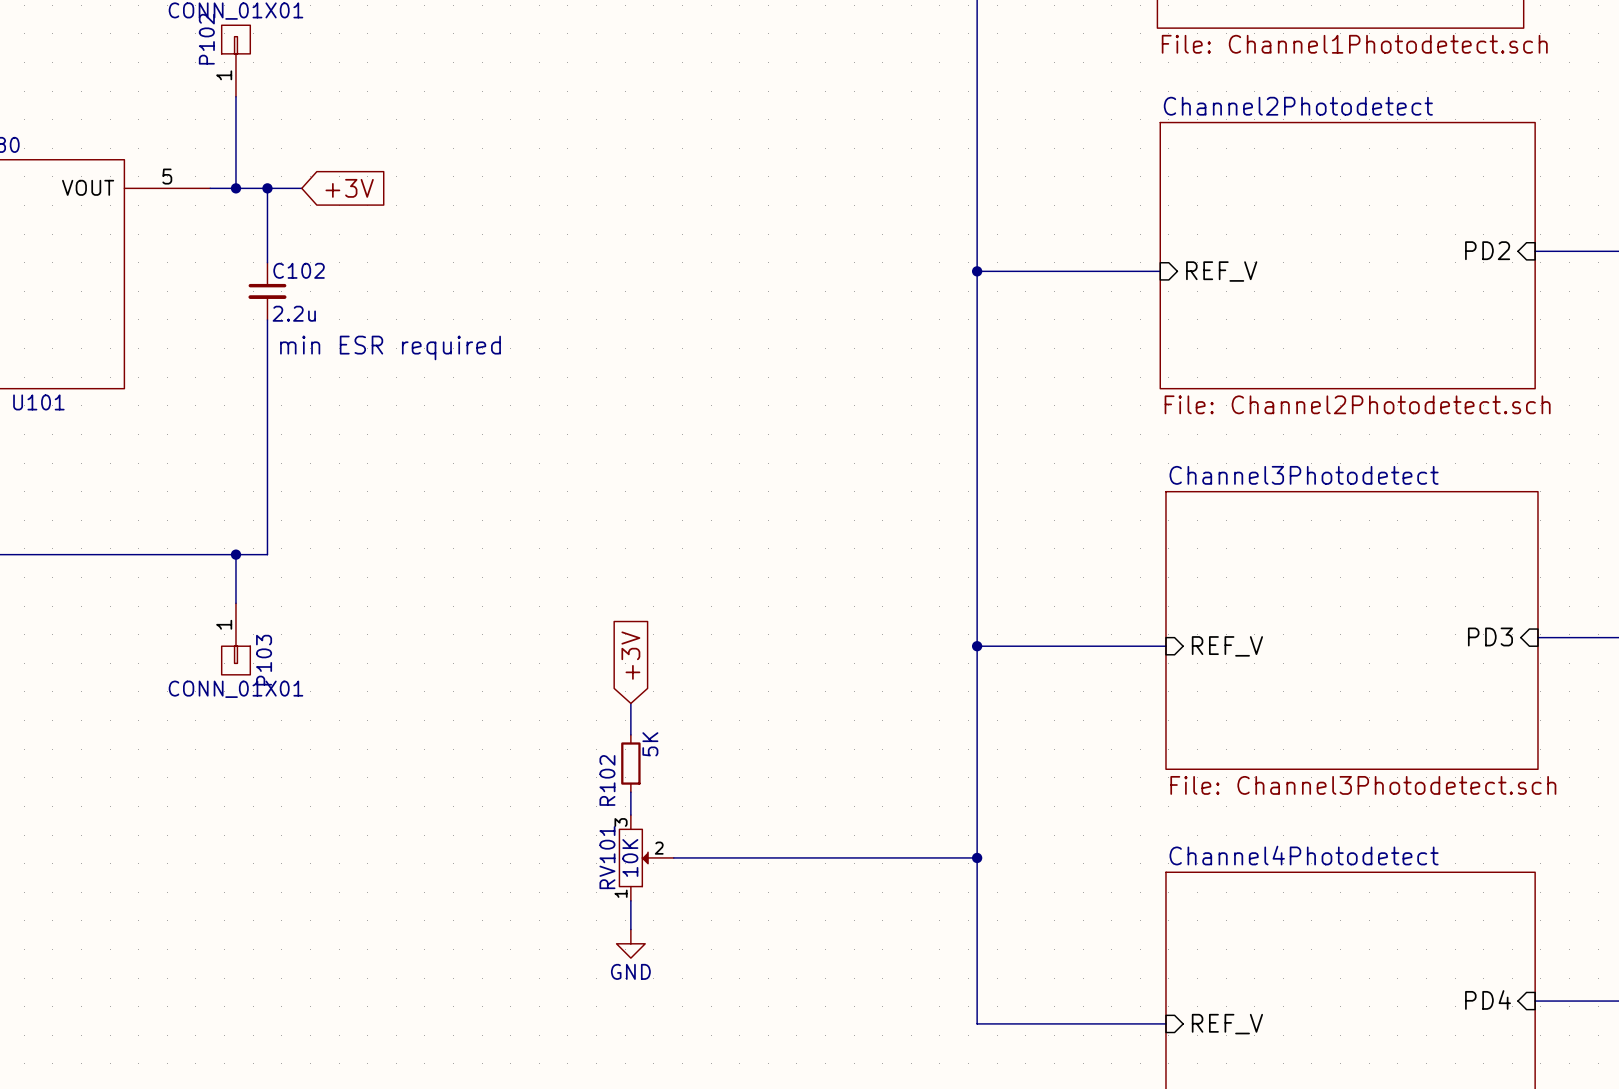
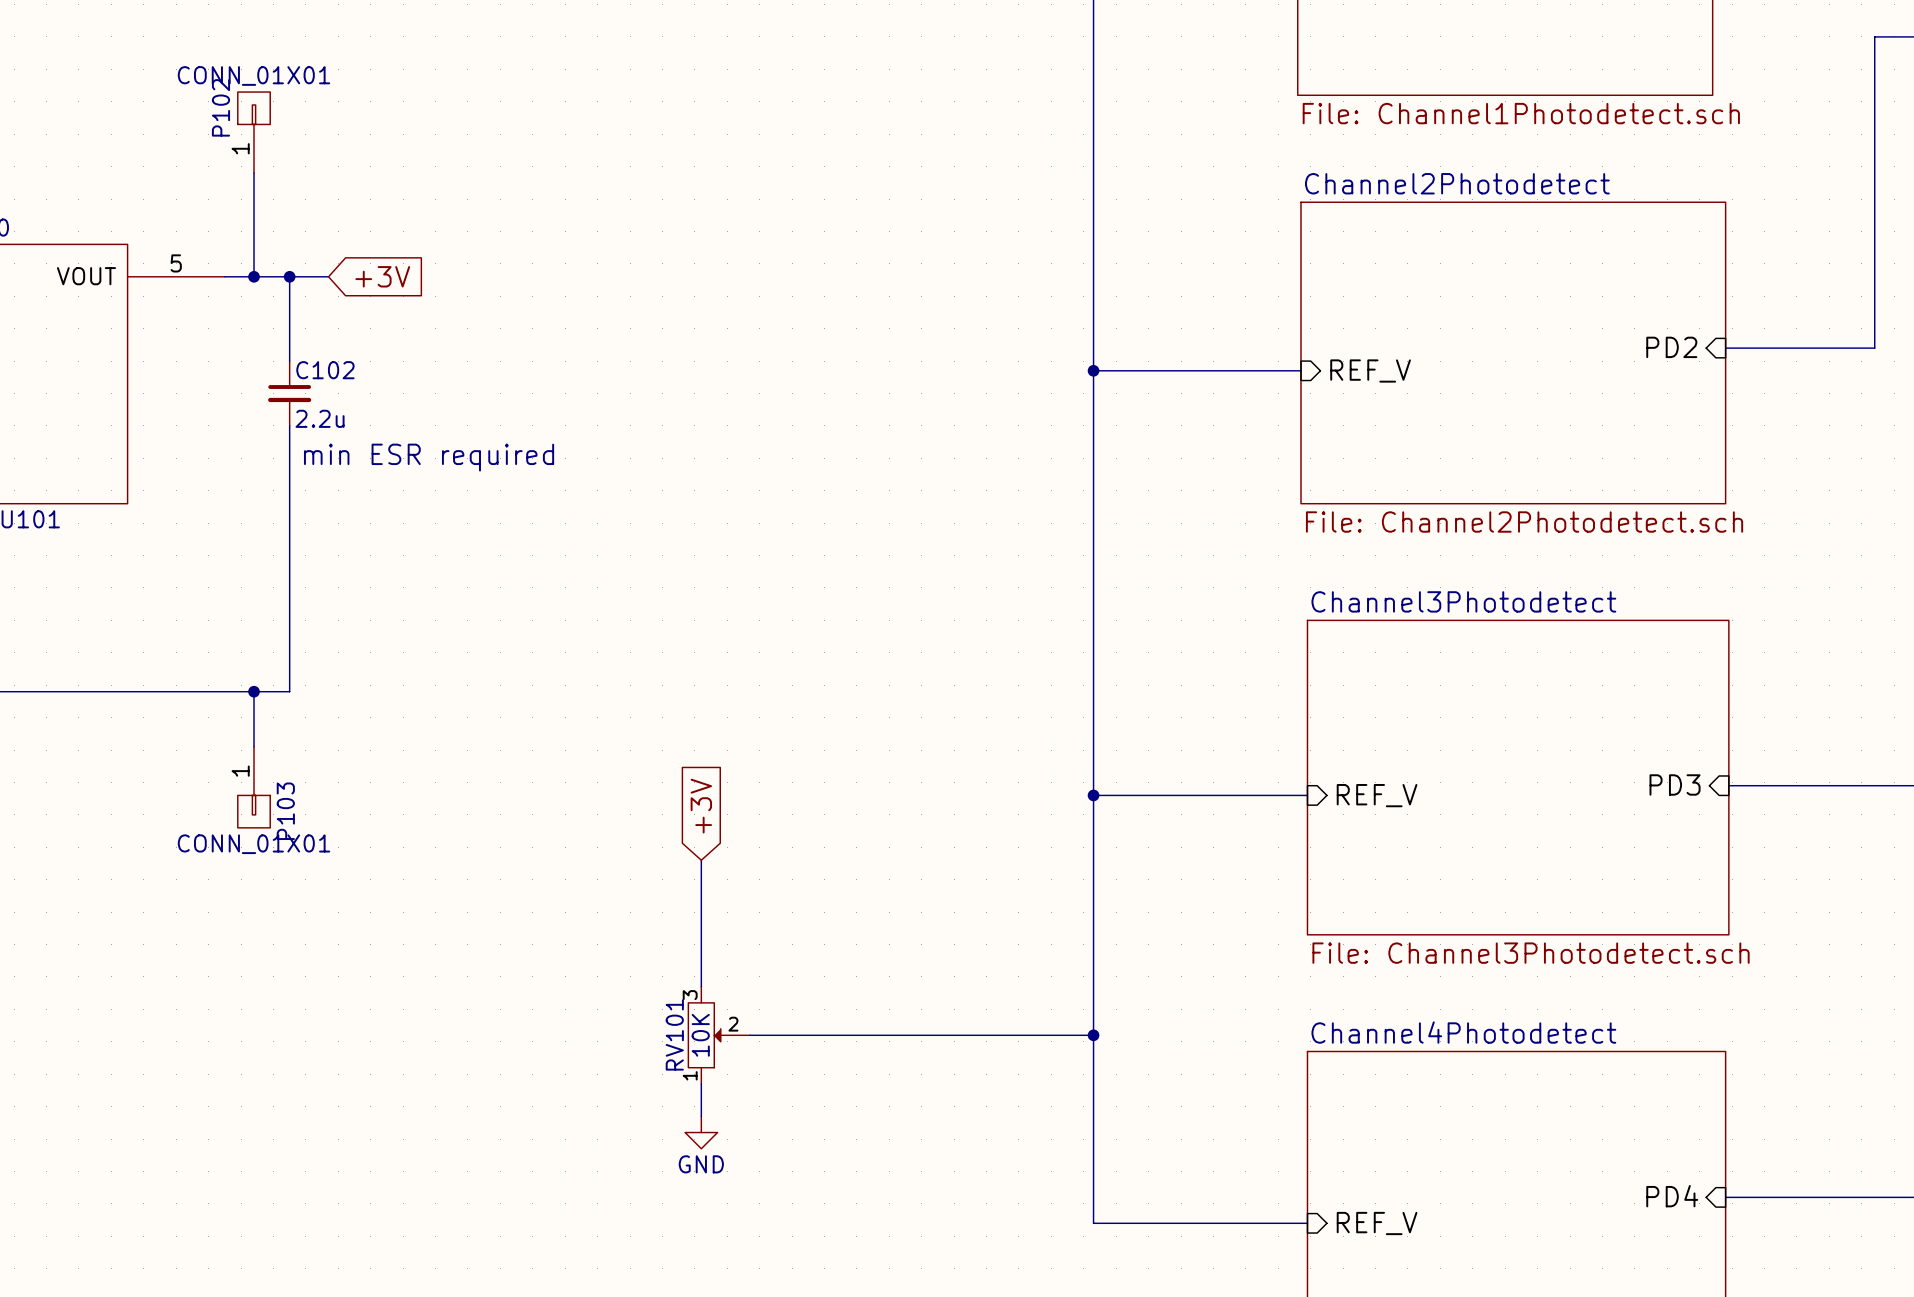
wire: none -> (701, 895) (701, 960)
R102: 5K (630, 763) -> none

